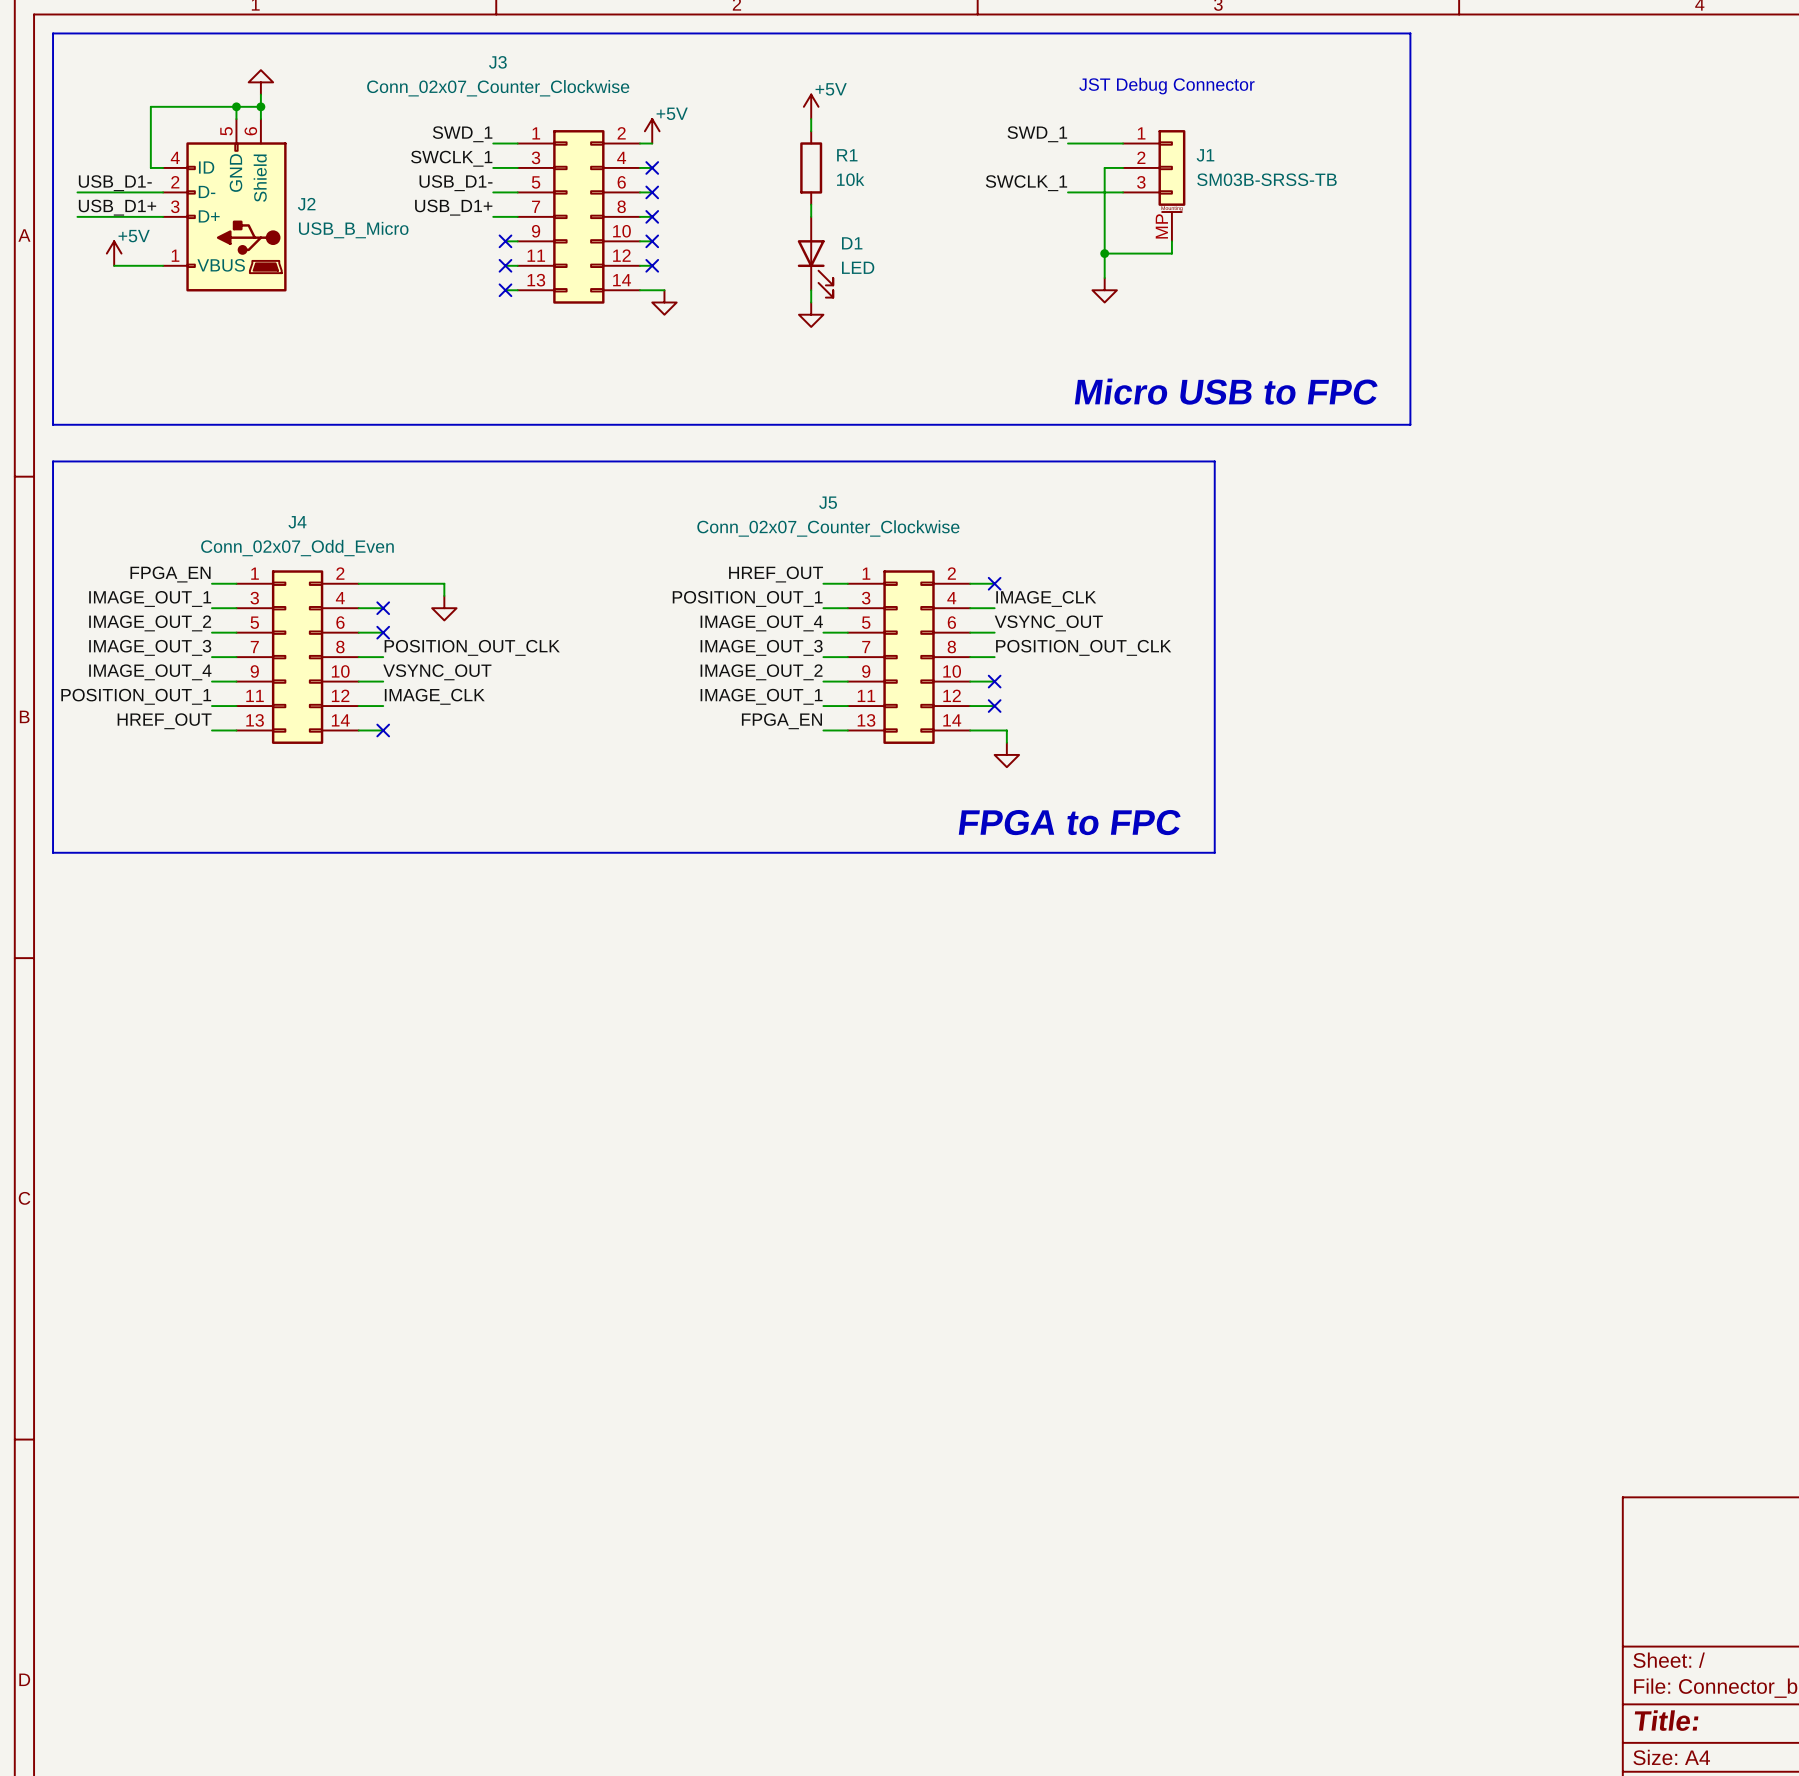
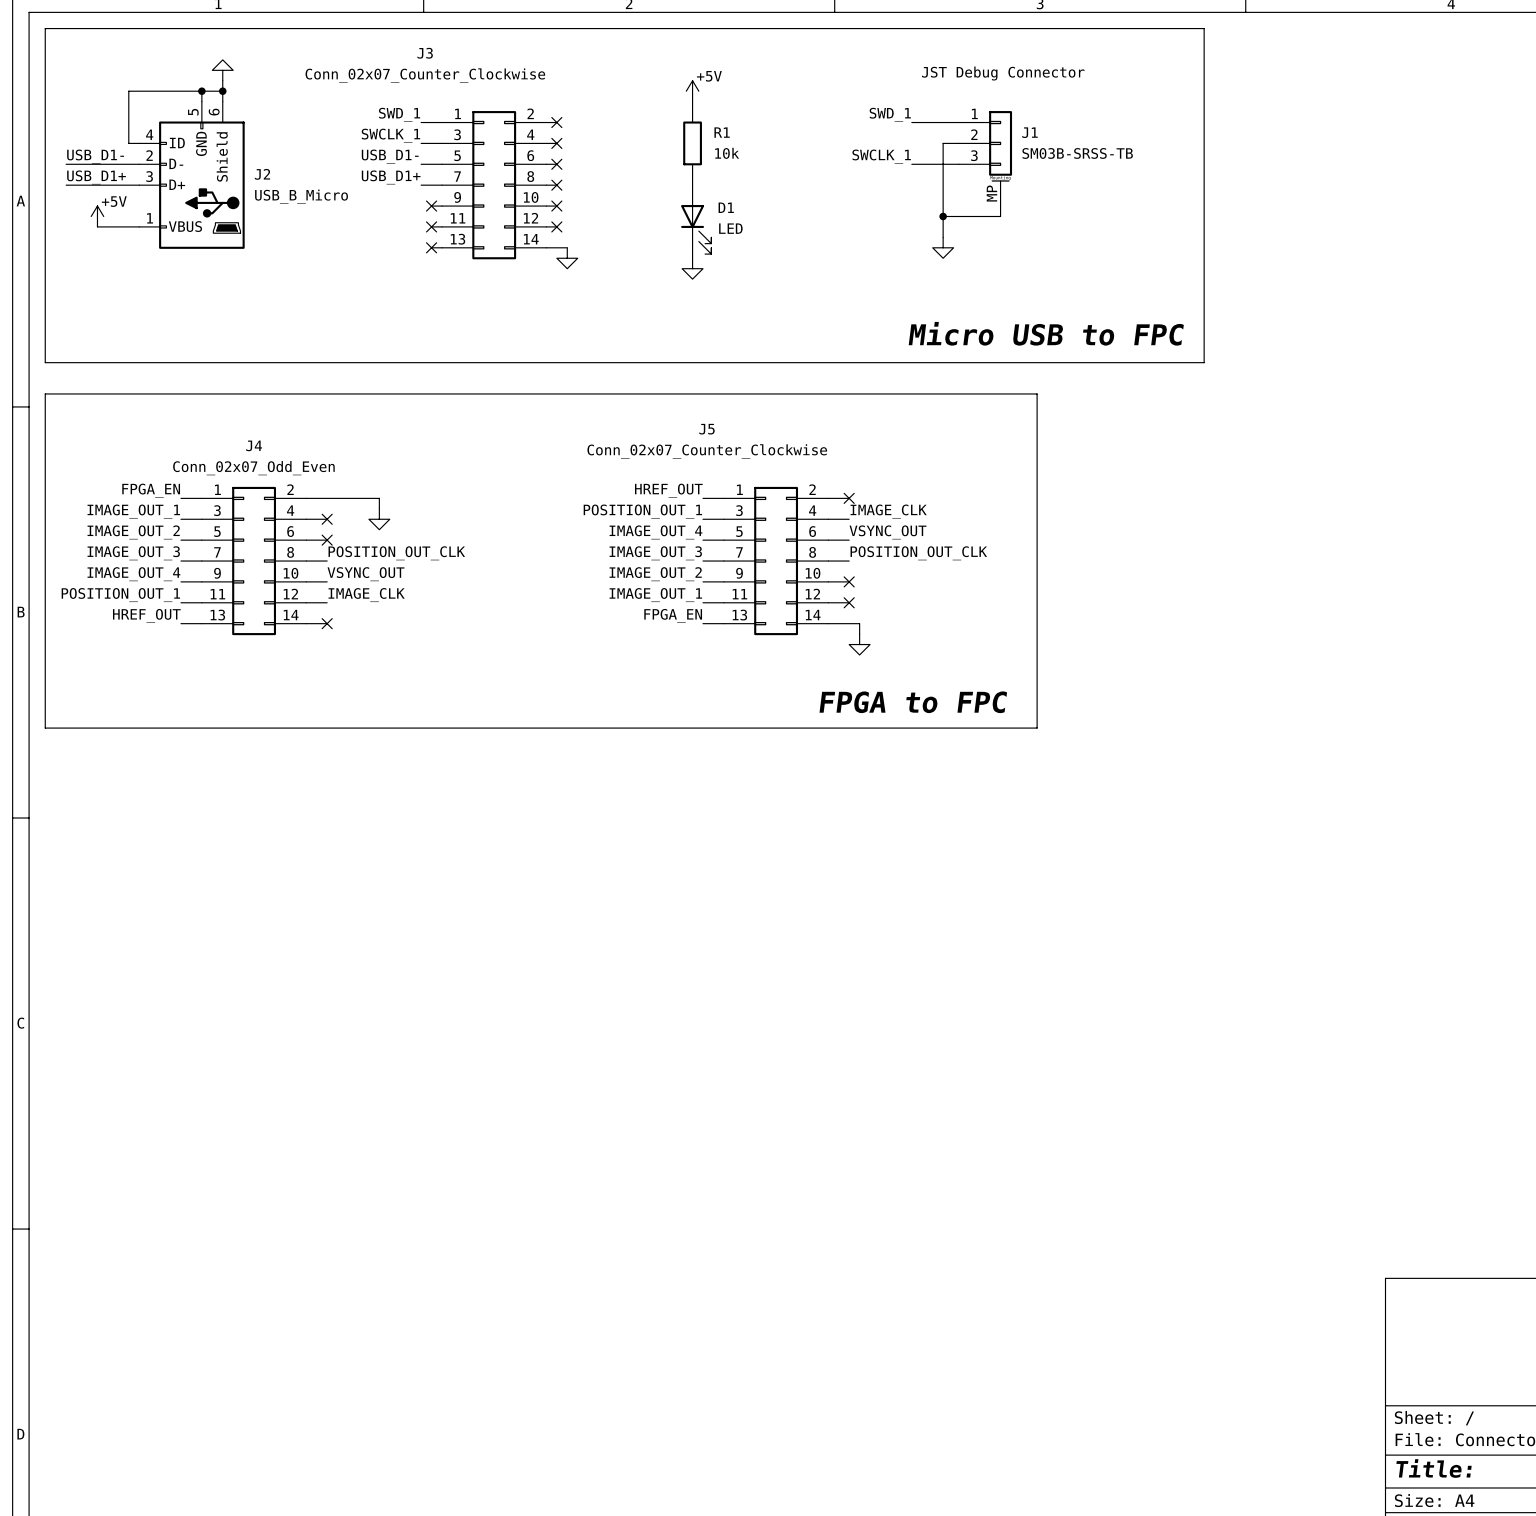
power symbol: +5V (652, 131) -> none
no-connect mark: none -> (556, 122)

